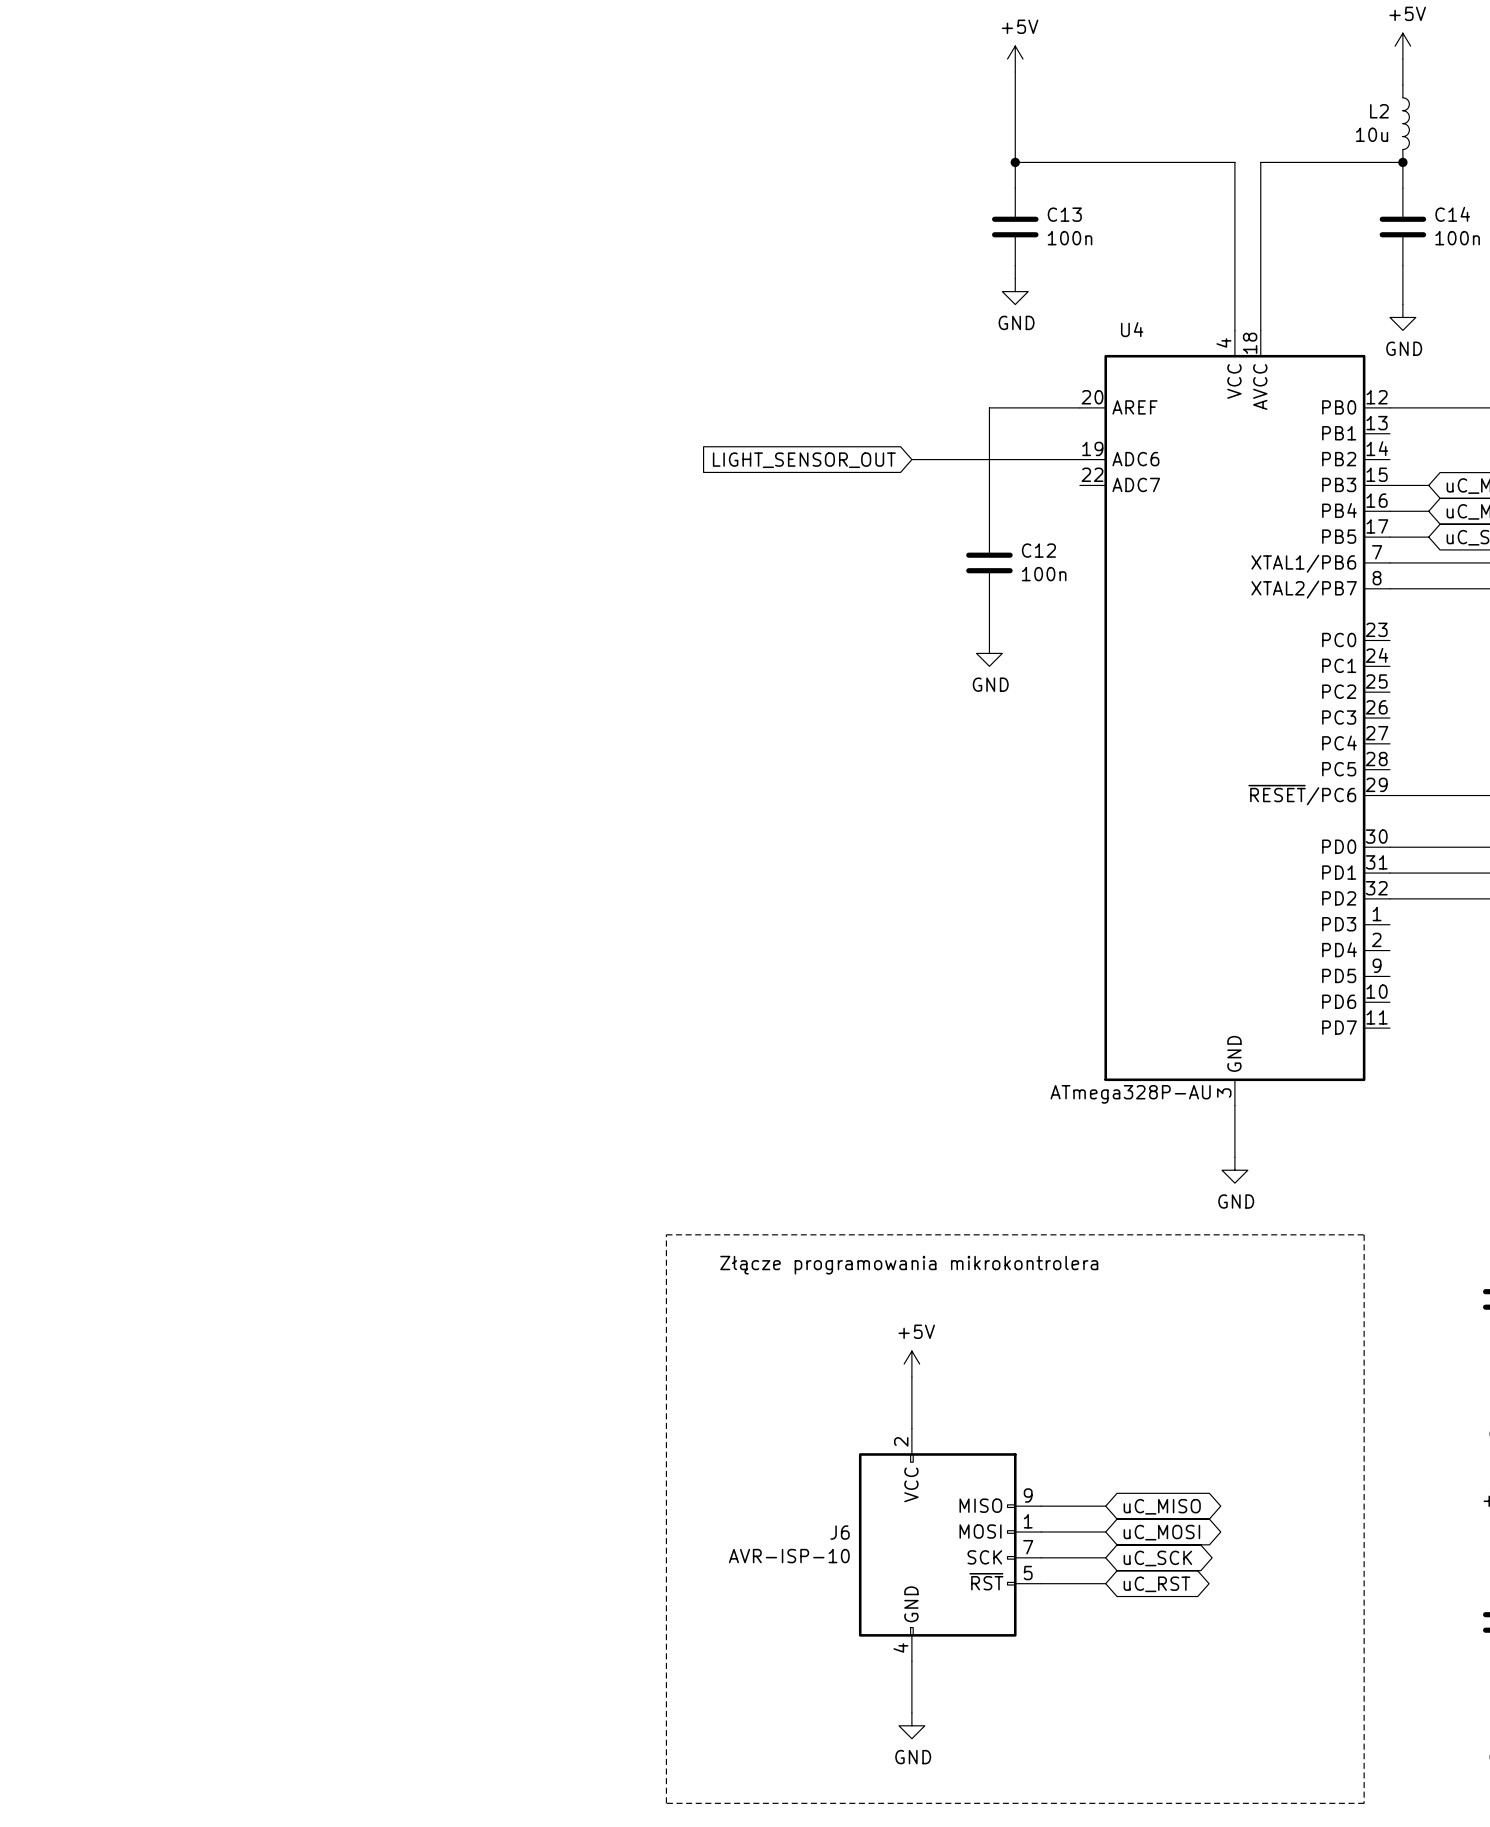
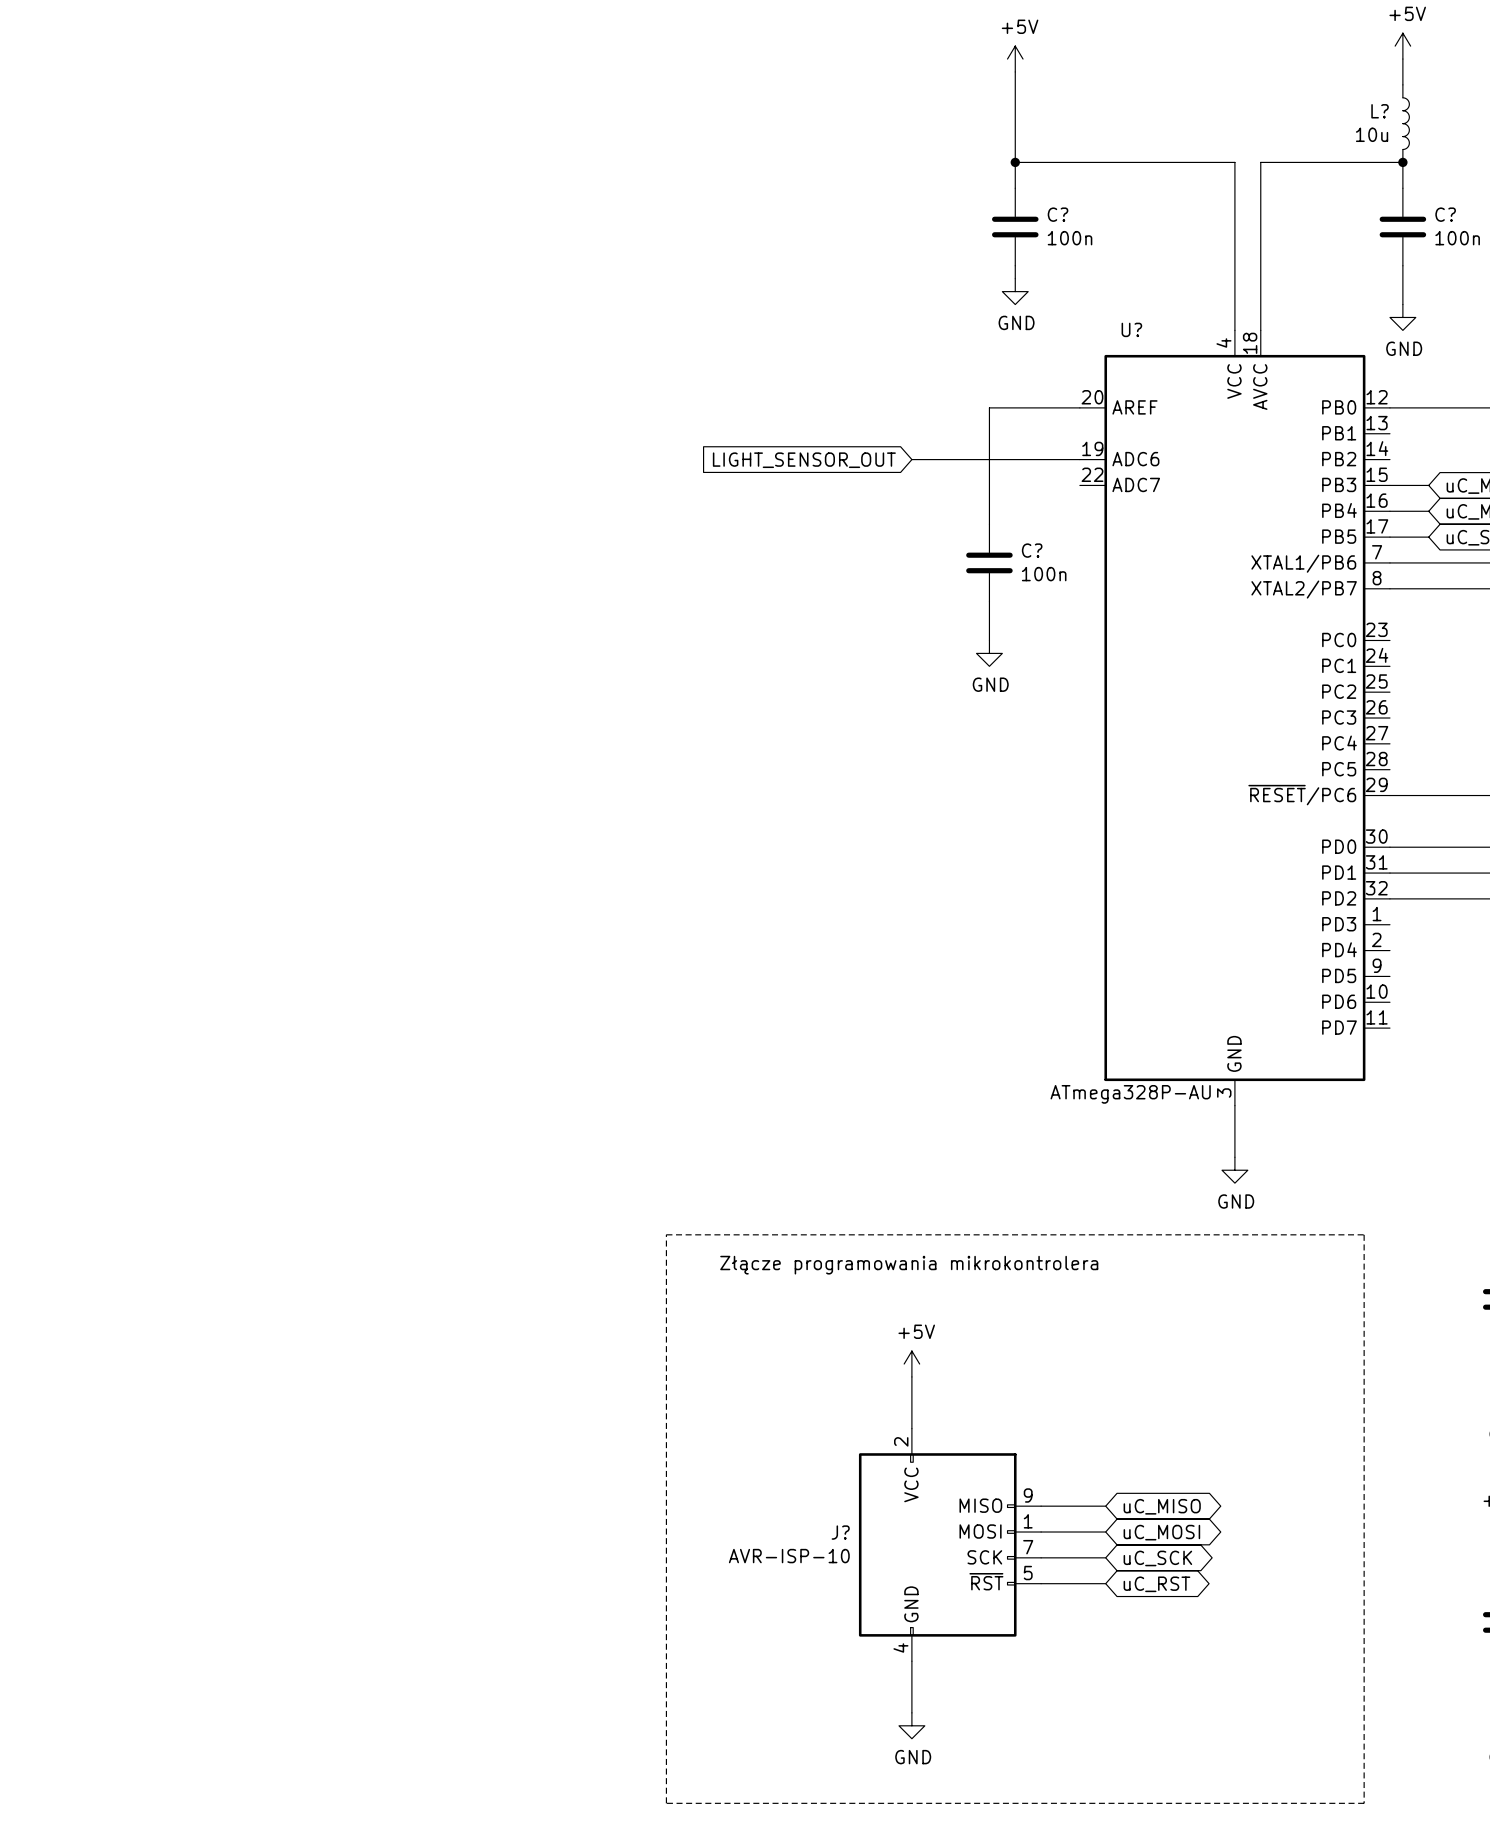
L2 name: L2 (1379, 111) -> L? (1380, 111)
C13 name: C13 (1064, 214) -> C? (1058, 214)
C14 name: C14 (1452, 214) -> C? (1445, 214)
U4 name: U4 (1132, 329) -> U? (1131, 329)
C12 name: C12 (1038, 550) -> C? (1032, 550)
J6 name: J6 (840, 1532) -> J? (840, 1532)

